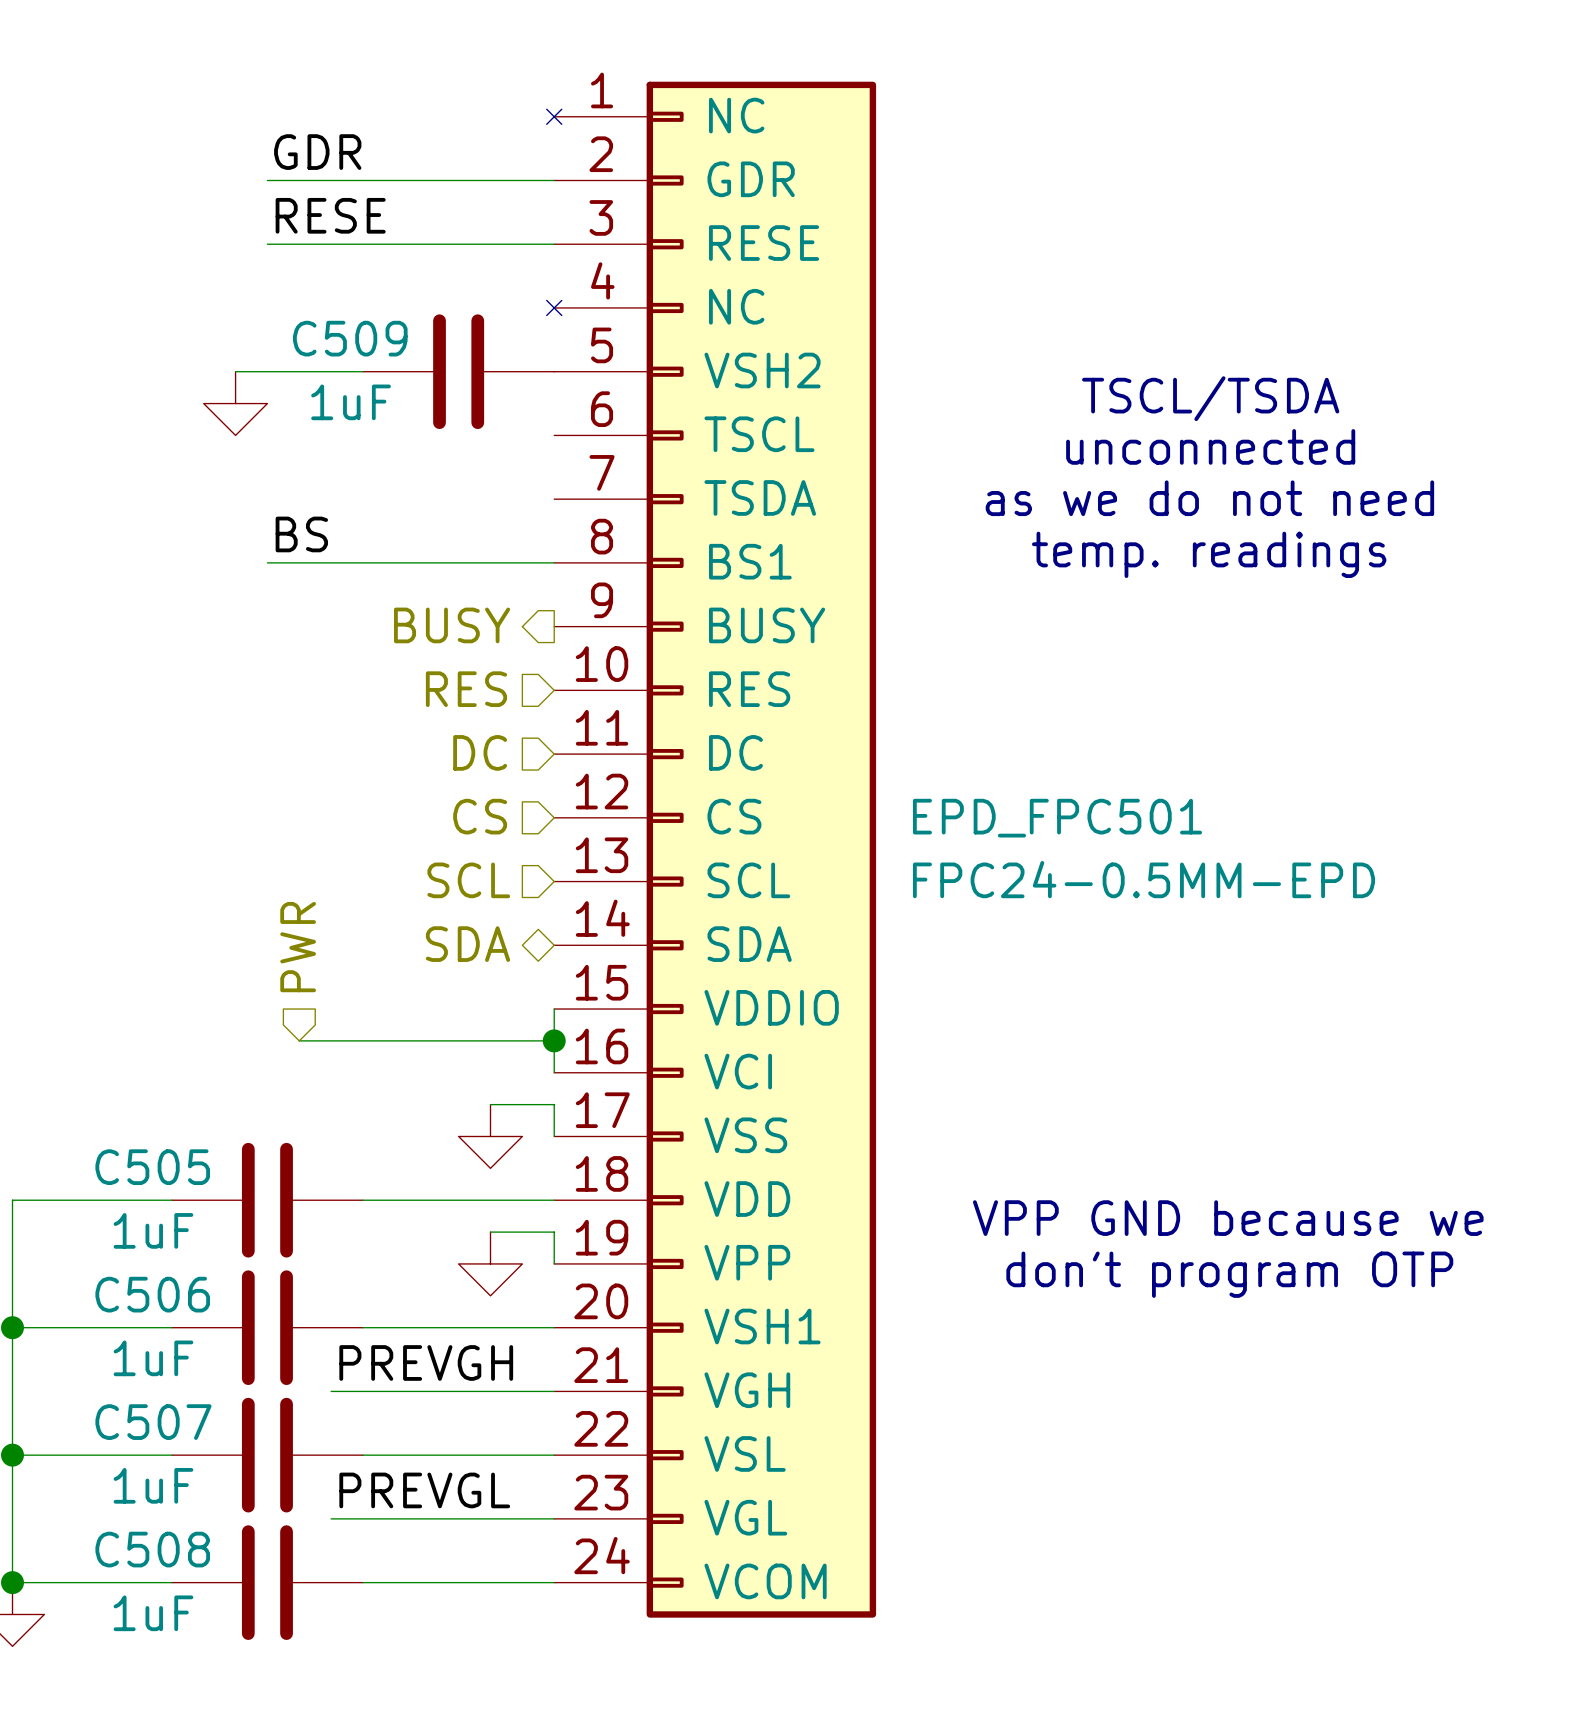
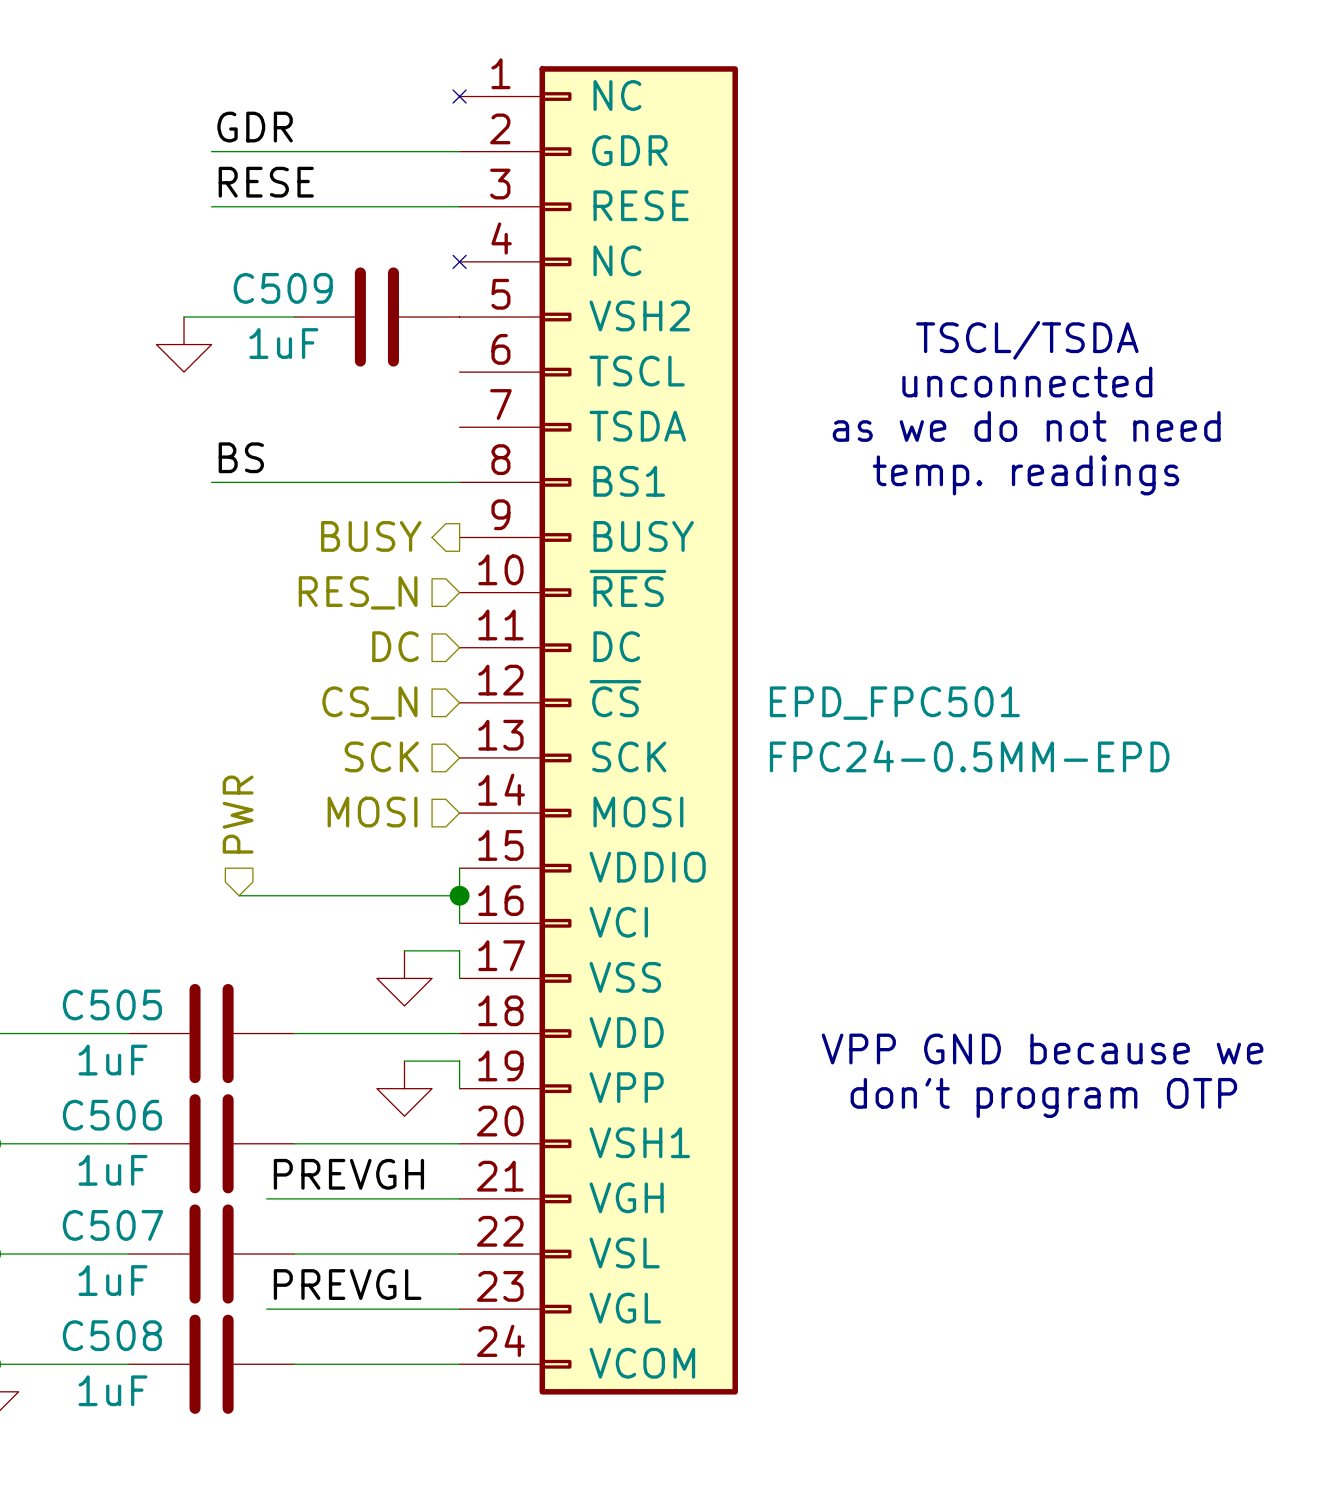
hierarchical label: RES (466, 689) -> RES_N (358, 592)
EPD_FPC501 pin name: RES (749, 689) -> ~{RES} (627, 588)
hierarchical label: CS (480, 816) -> CS_N (369, 703)
EPD_FPC501 pin name: CS (734, 816) -> ~{CS} (615, 698)
hierarchical label: SCL (468, 880) -> SCK (381, 756)
EPD_FPC501 pin name: SCL (748, 880) -> SCK (629, 756)
hierarchical label shape: bidirectional (468, 944) -> input (372, 812)
hierarchical label: SDA (468, 944) -> MOSI (372, 812)
EPD_FPC501 pin name: SDA (749, 944) -> MOSI (638, 812)

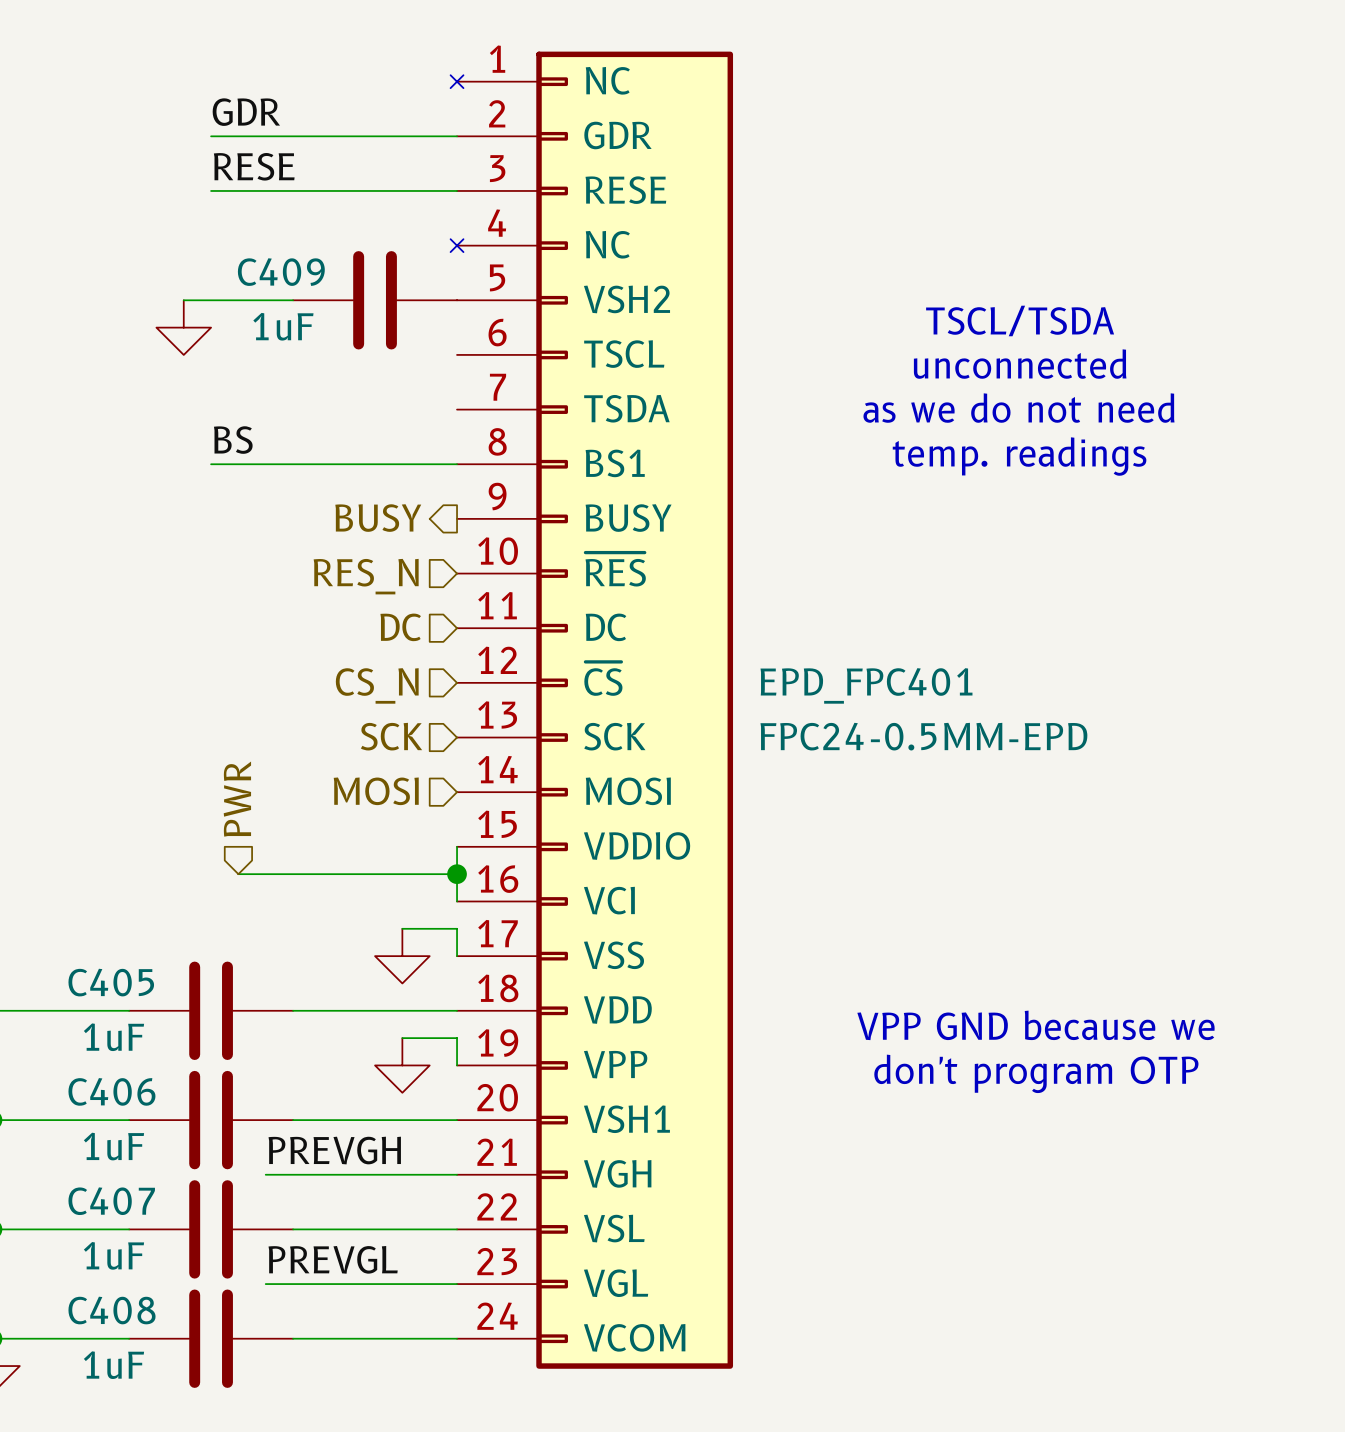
C509 name: C509 (283, 288) -> C409 (281, 272)
EPD_FPC501 name: EPD_FPC501 (894, 703) -> EPD_FPC401 (866, 685)
C505 name: C505 (112, 1004) -> C405 (111, 982)
C506 name: C506 (112, 1115) -> C406 (111, 1091)
C507 name: C507 (113, 1225) -> C407 (111, 1201)
C508 name: C508 (112, 1335) -> C408 (112, 1310)

